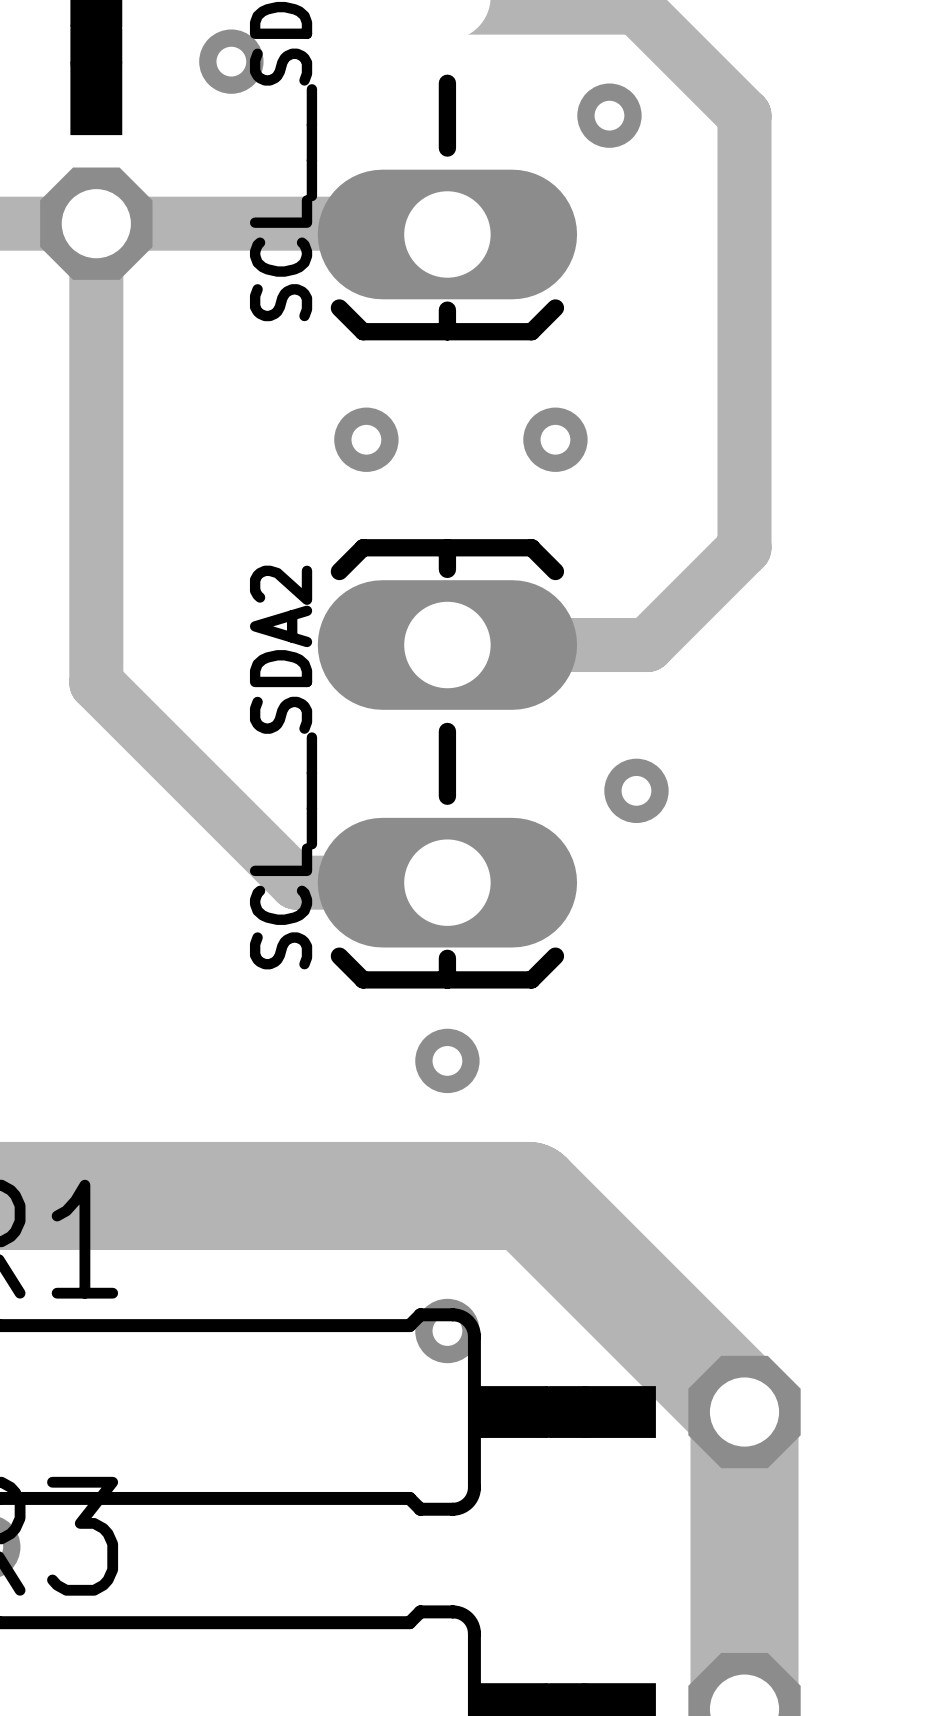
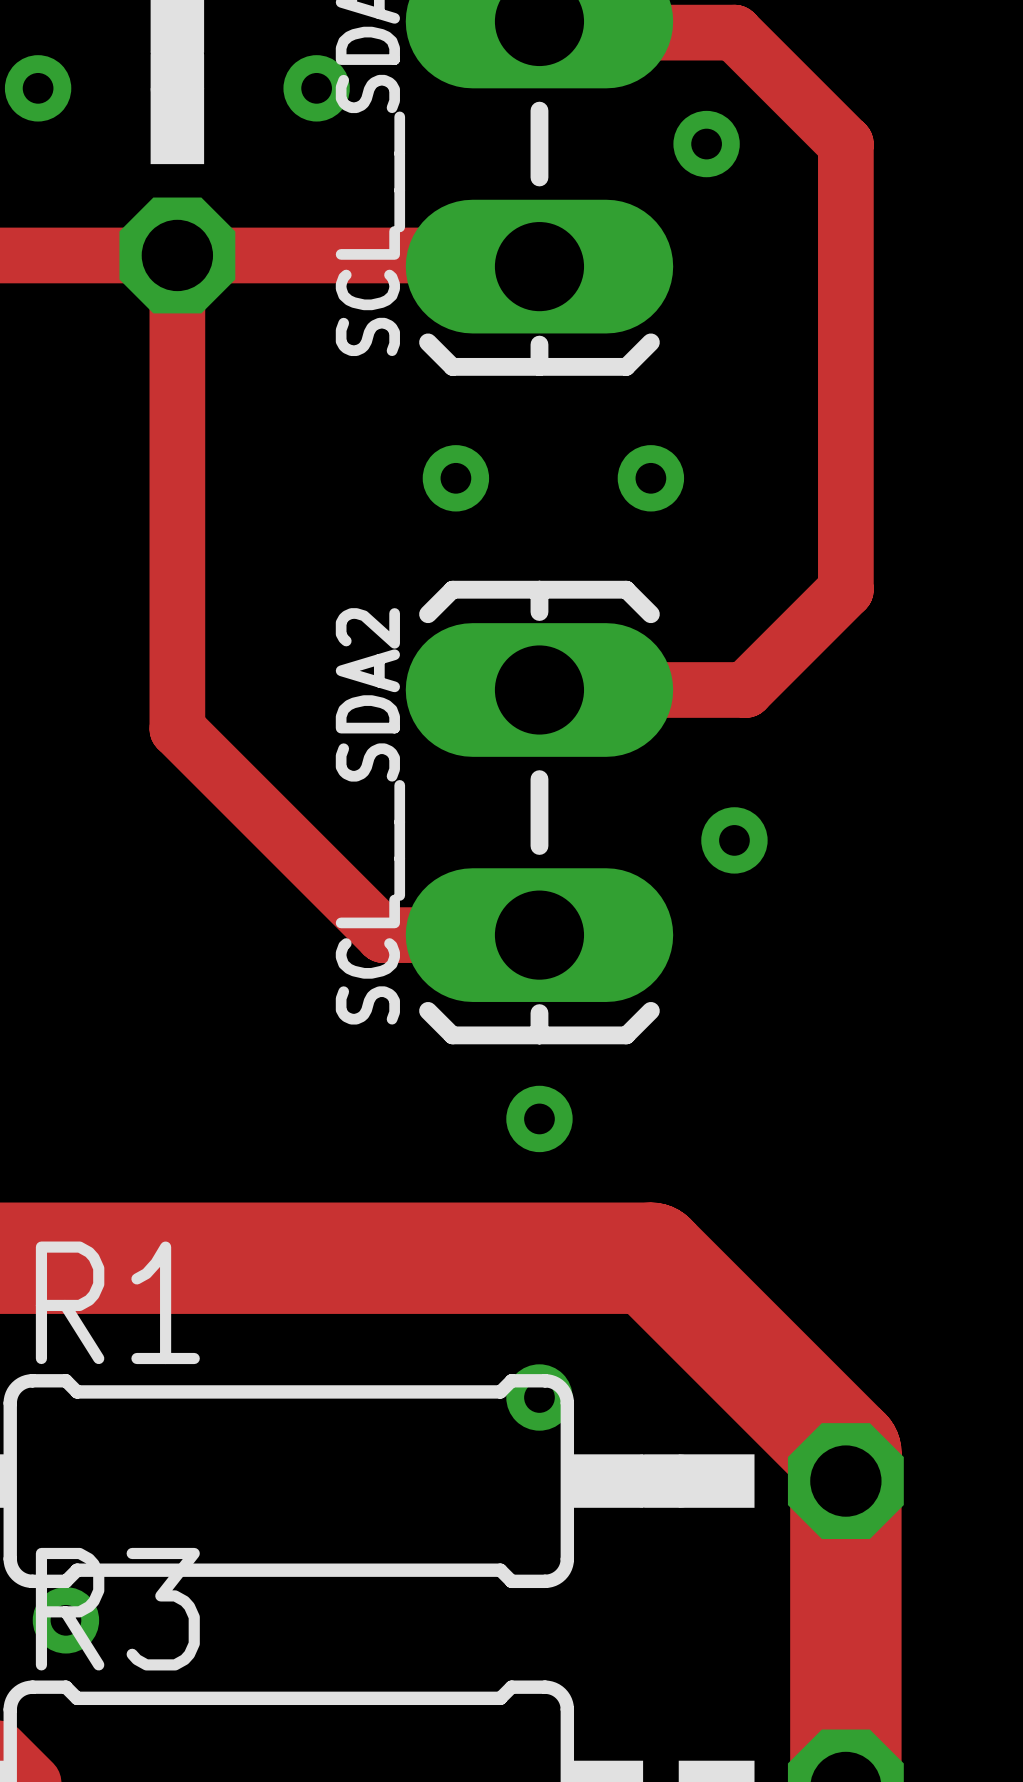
track: (528, 1195) (744, 1412) -> (623, 1258) (650, 1258) (845, 1453) (845, 1481)

